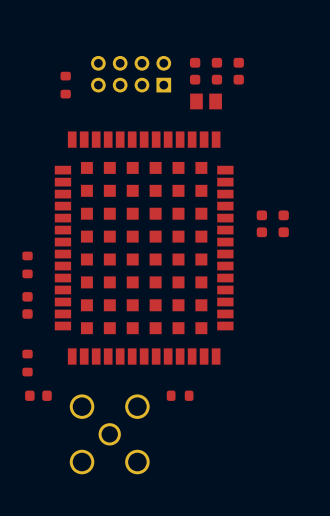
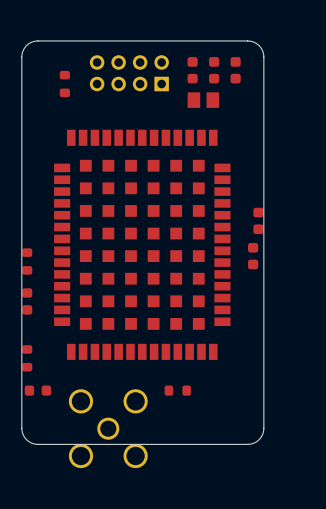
board edge: none -> (247, 40) (37, 40) (29, 43) (23, 49) (21, 57) (21, 428) (23, 436) (29, 442) (37, 444) (247, 444) (255, 442) (261, 436) (263, 428) (263, 57) (259, 45) (247, 40)
part position: (283, 223) -> (253, 256)

